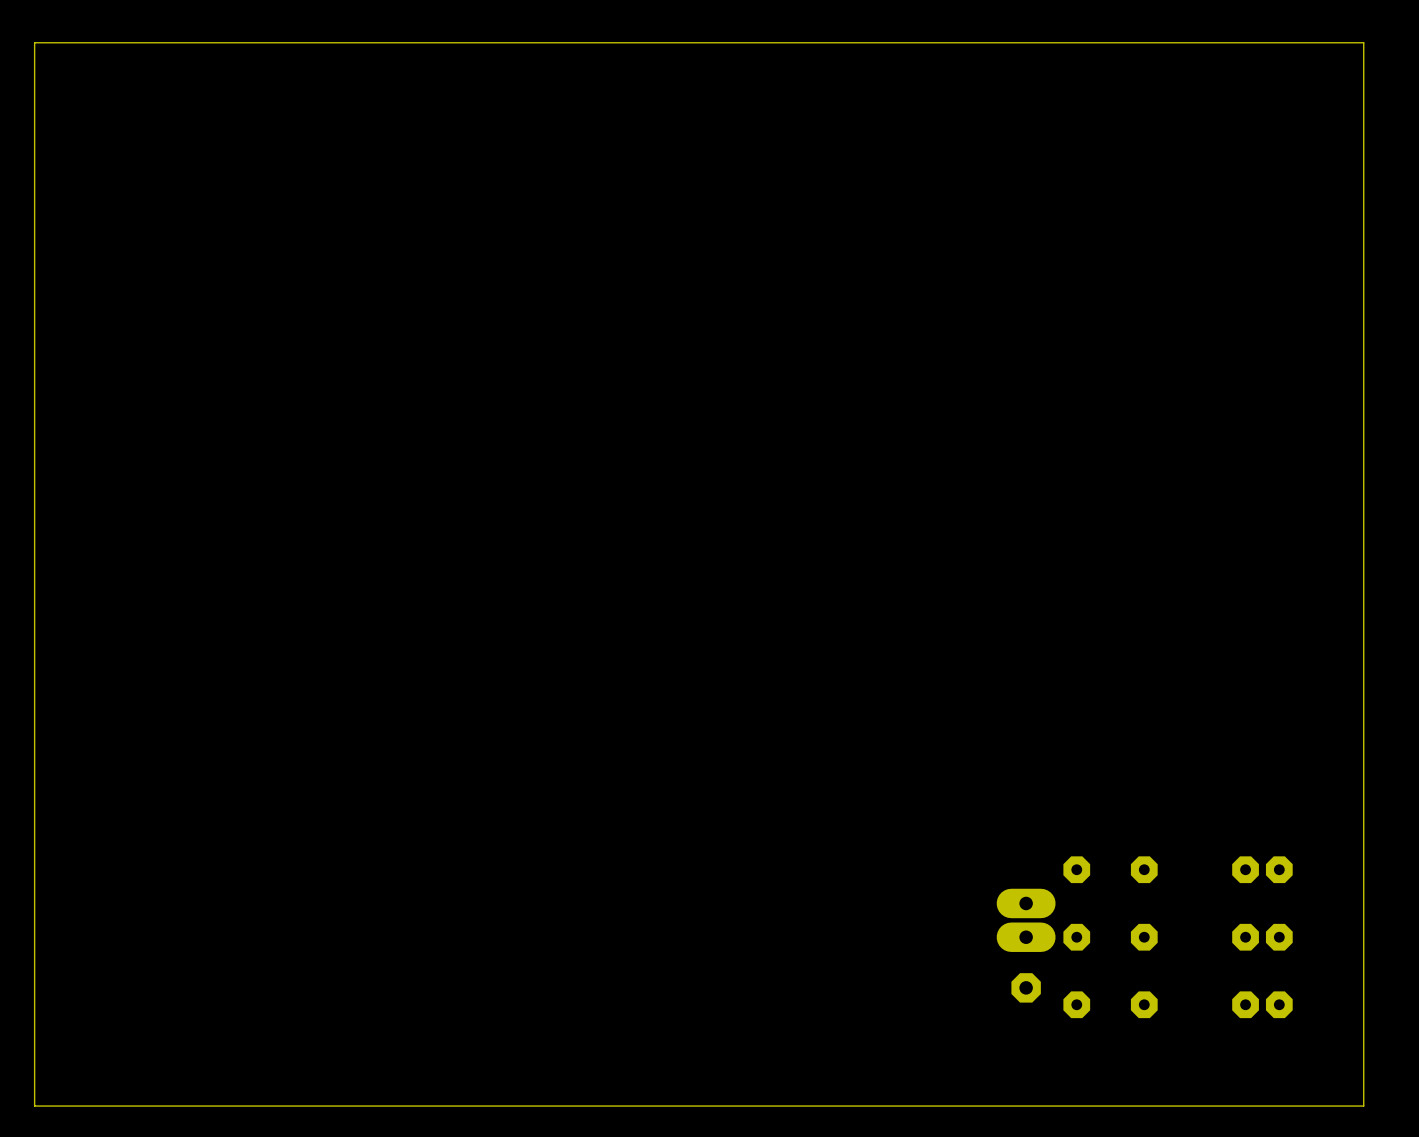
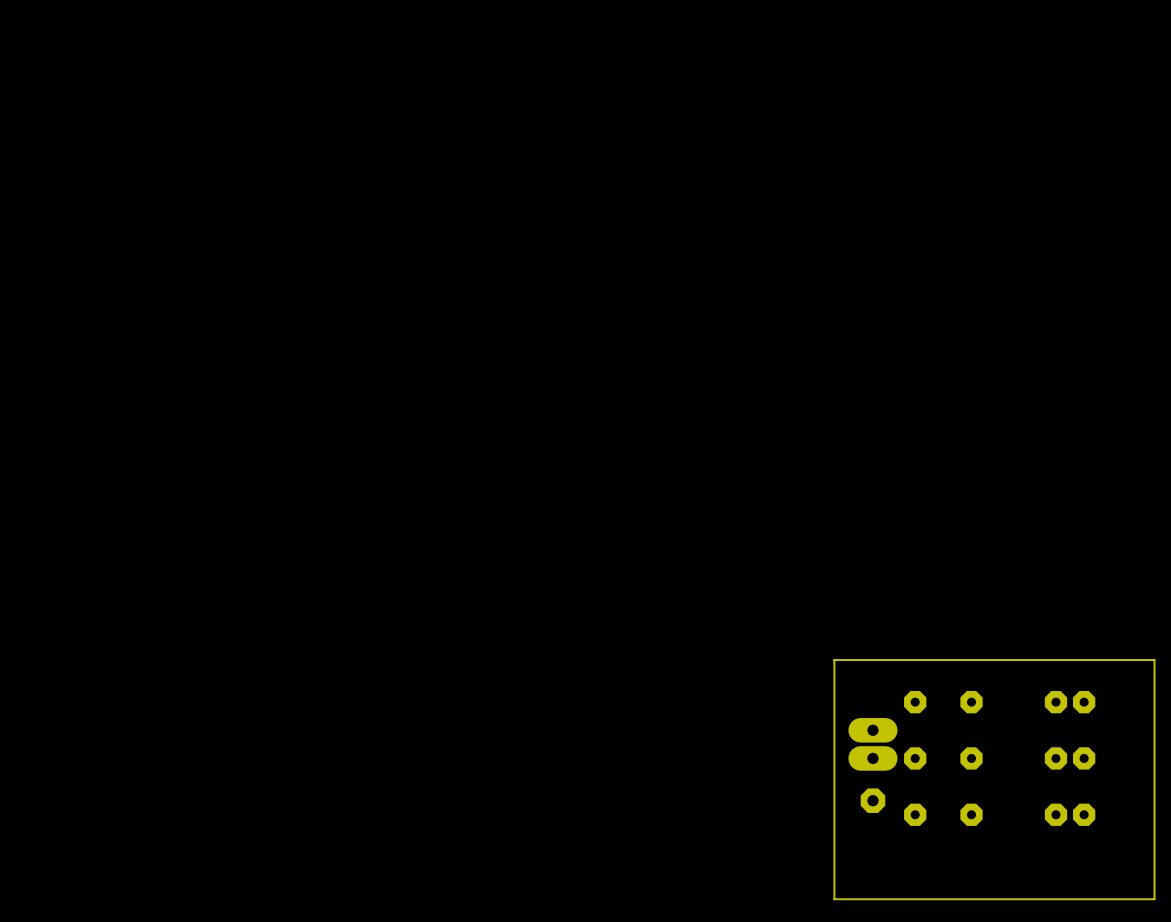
board edge: (1363, 819) (1363, 42) (34, 42) (34, 1106) (979, 1106) -> (1154, 660) (834, 660) (834, 899)

